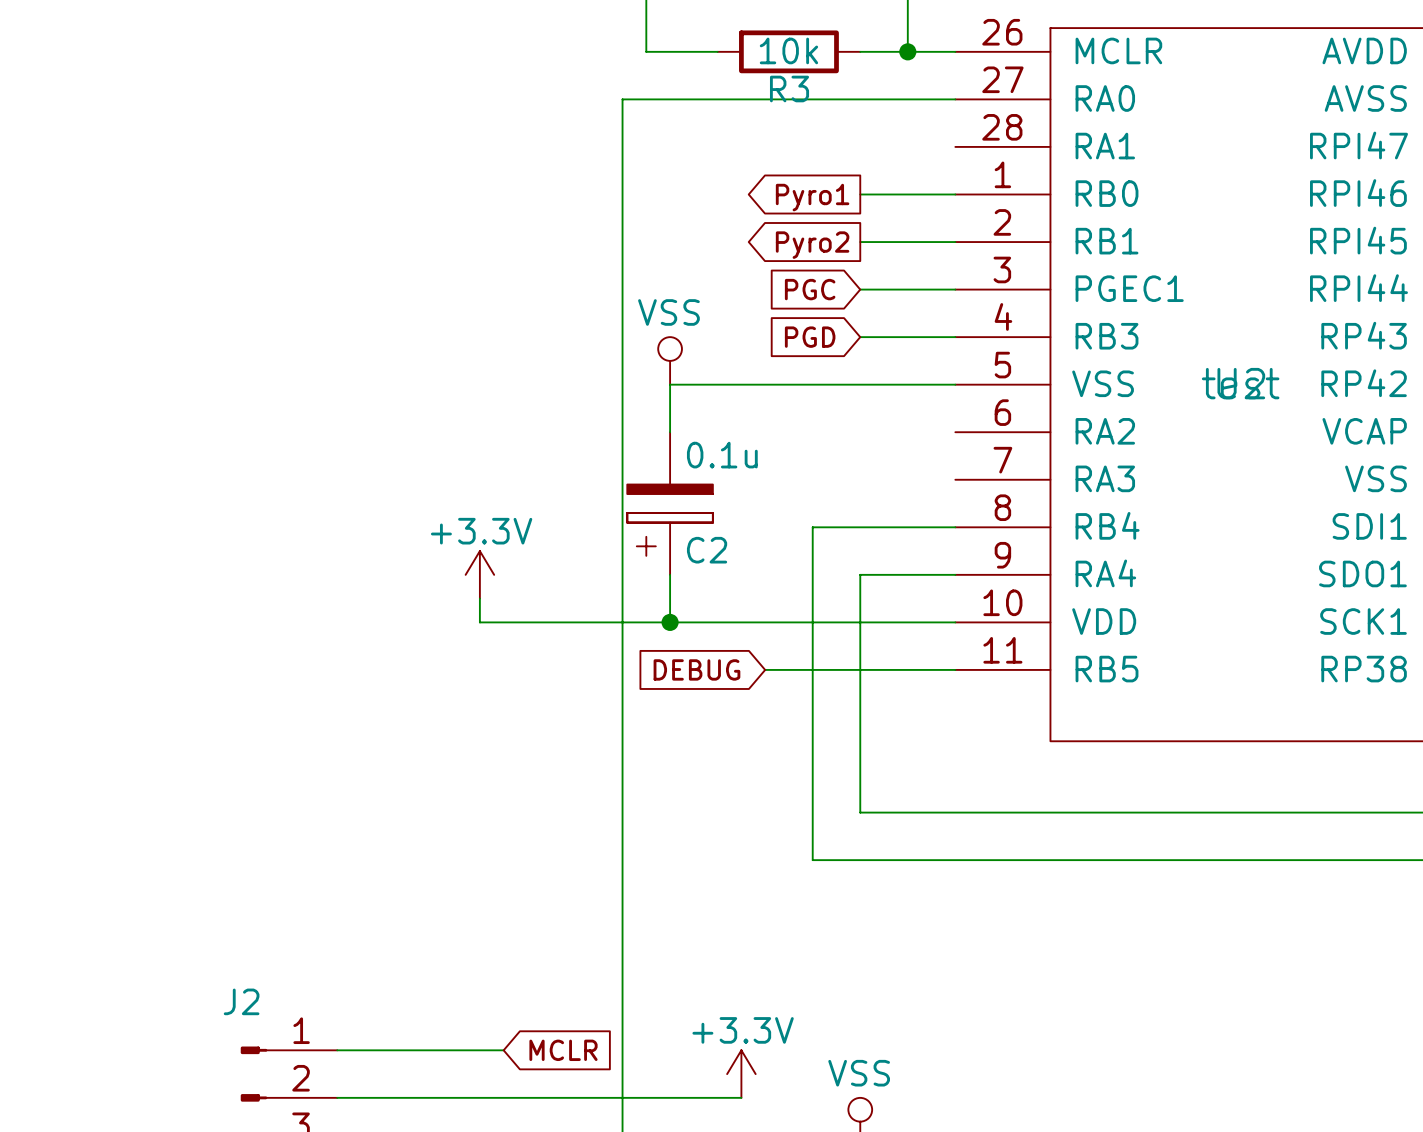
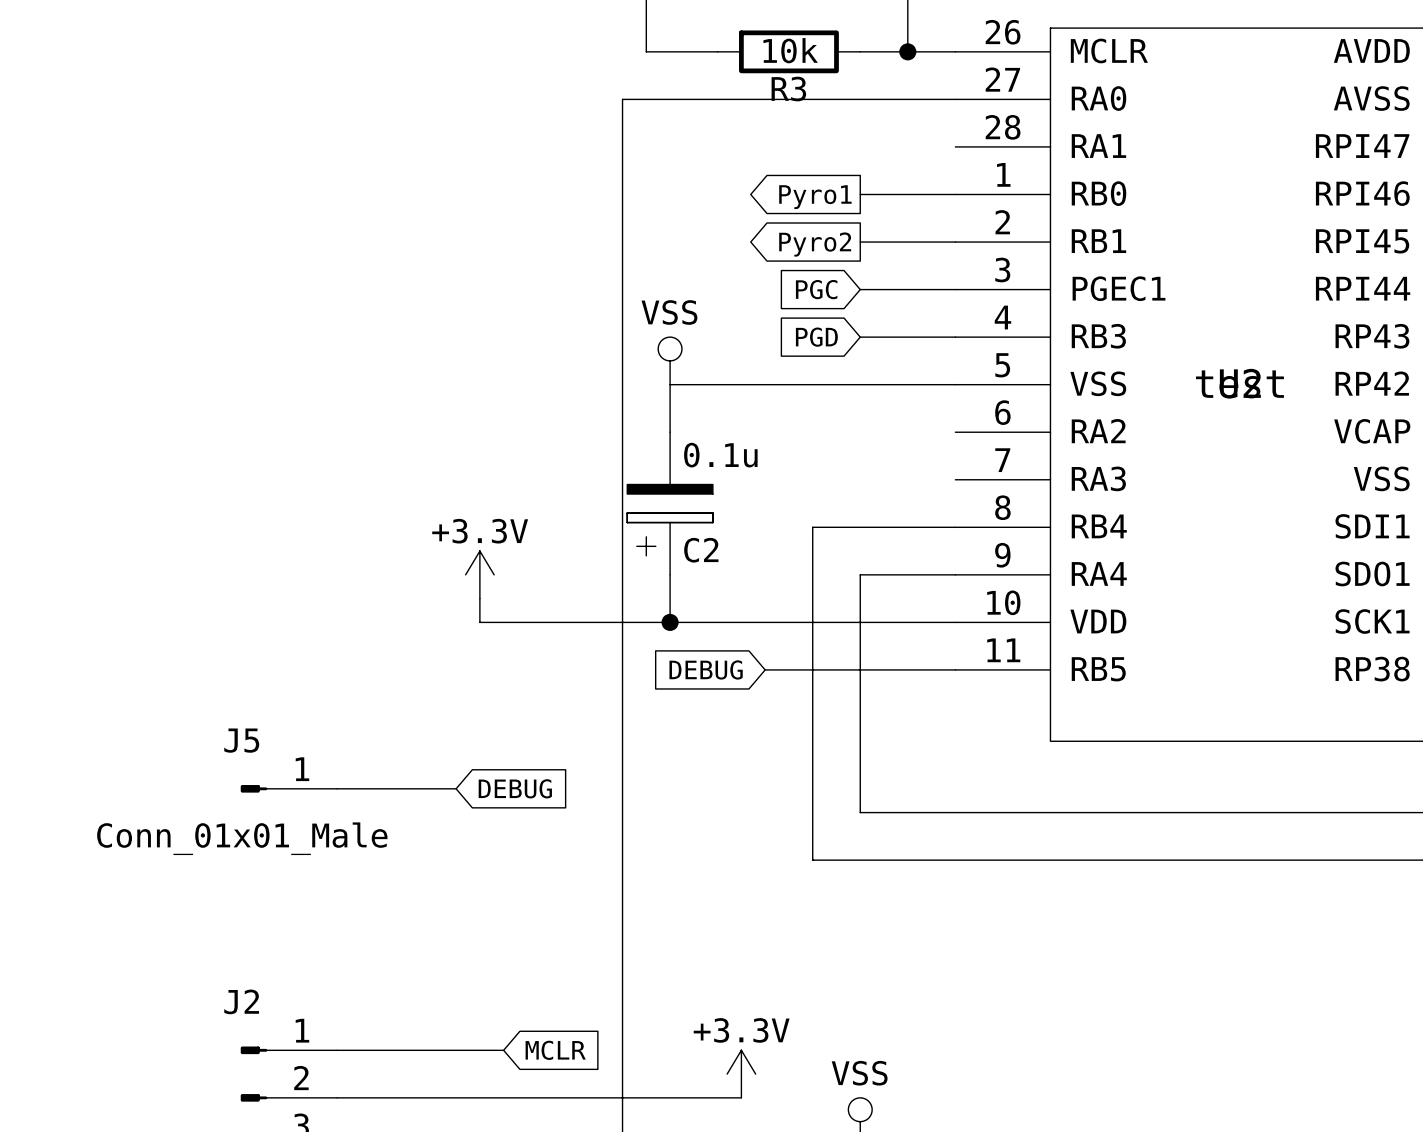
J5: none -> Conn_01x01_Male (289, 788)
wire: none -> (337, 788) (456, 788)
global label: none -> DEBUG (515, 788)

